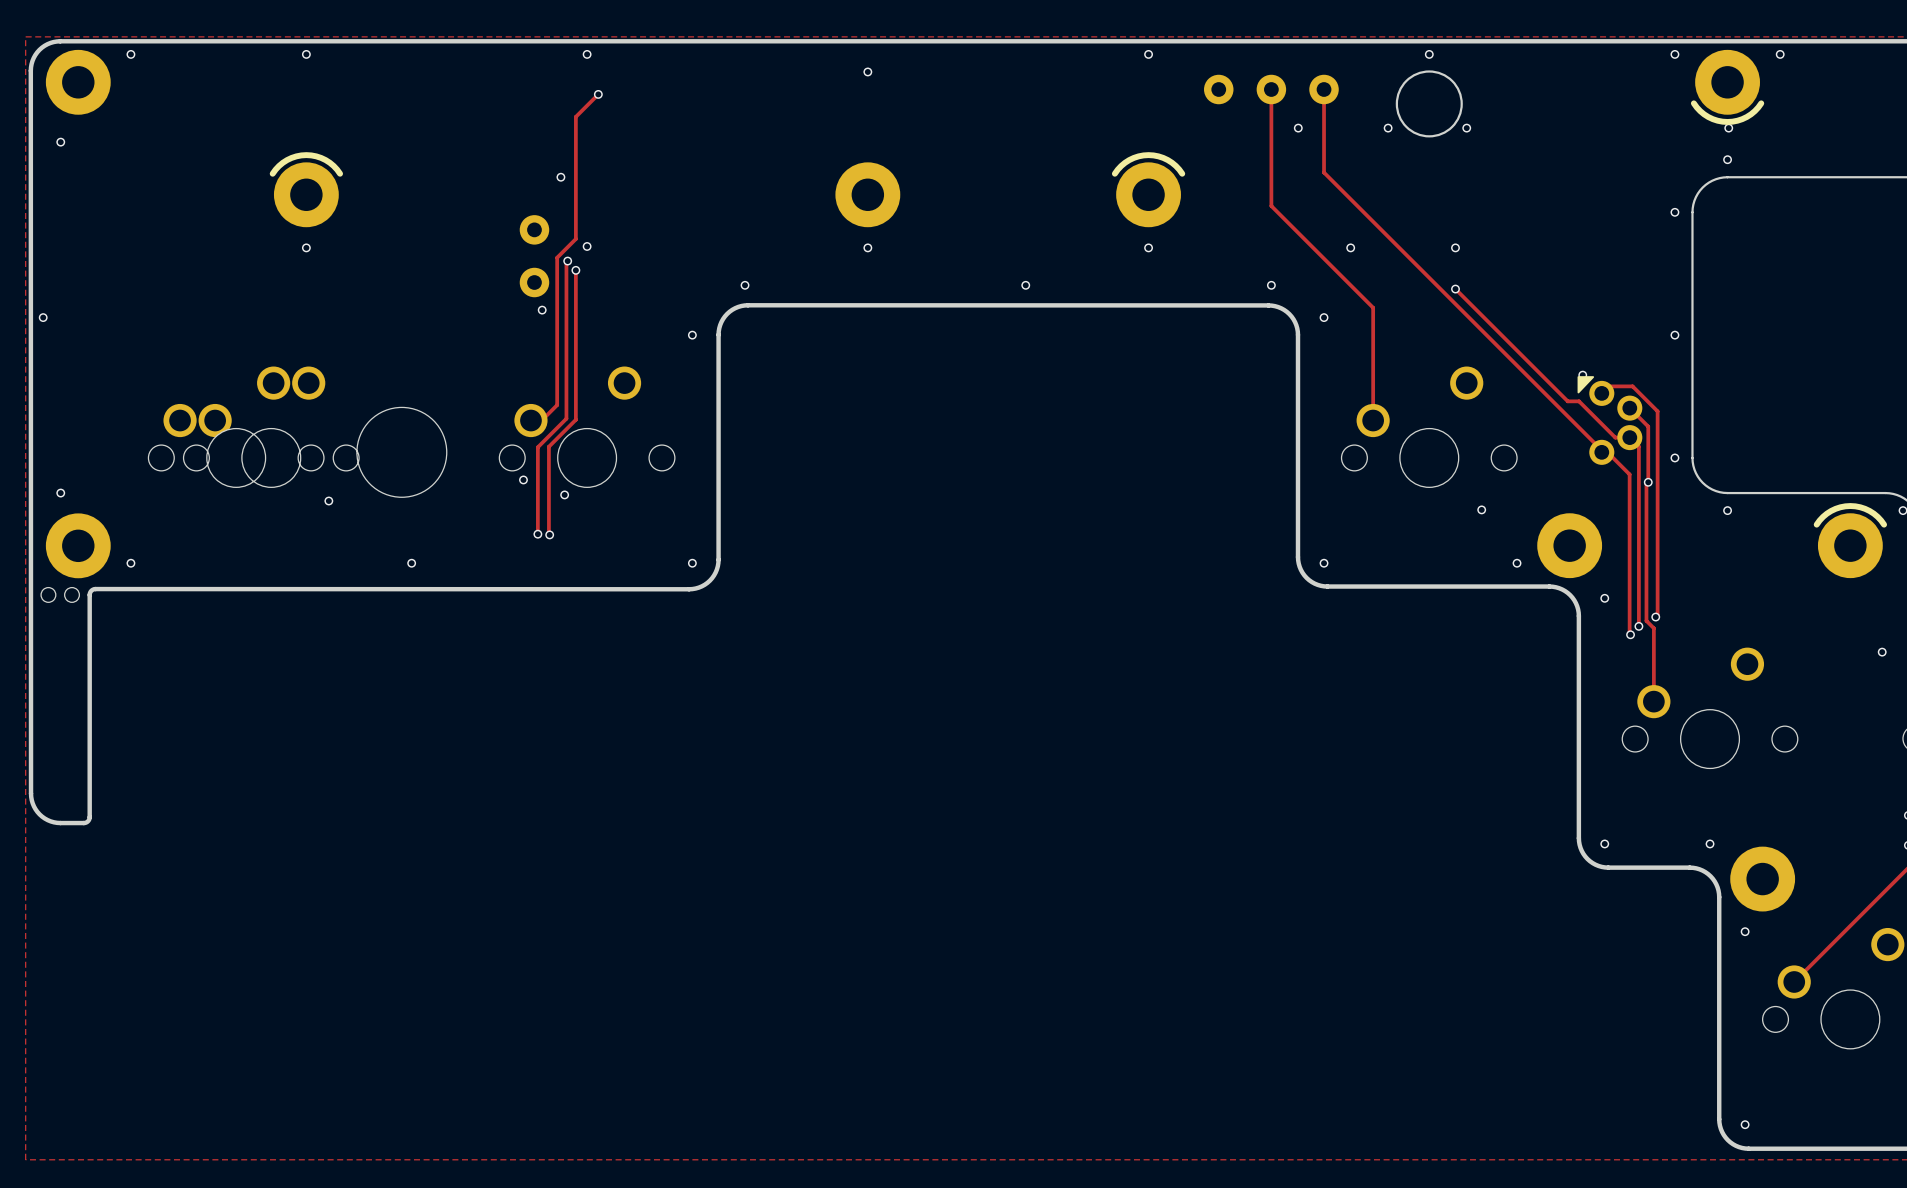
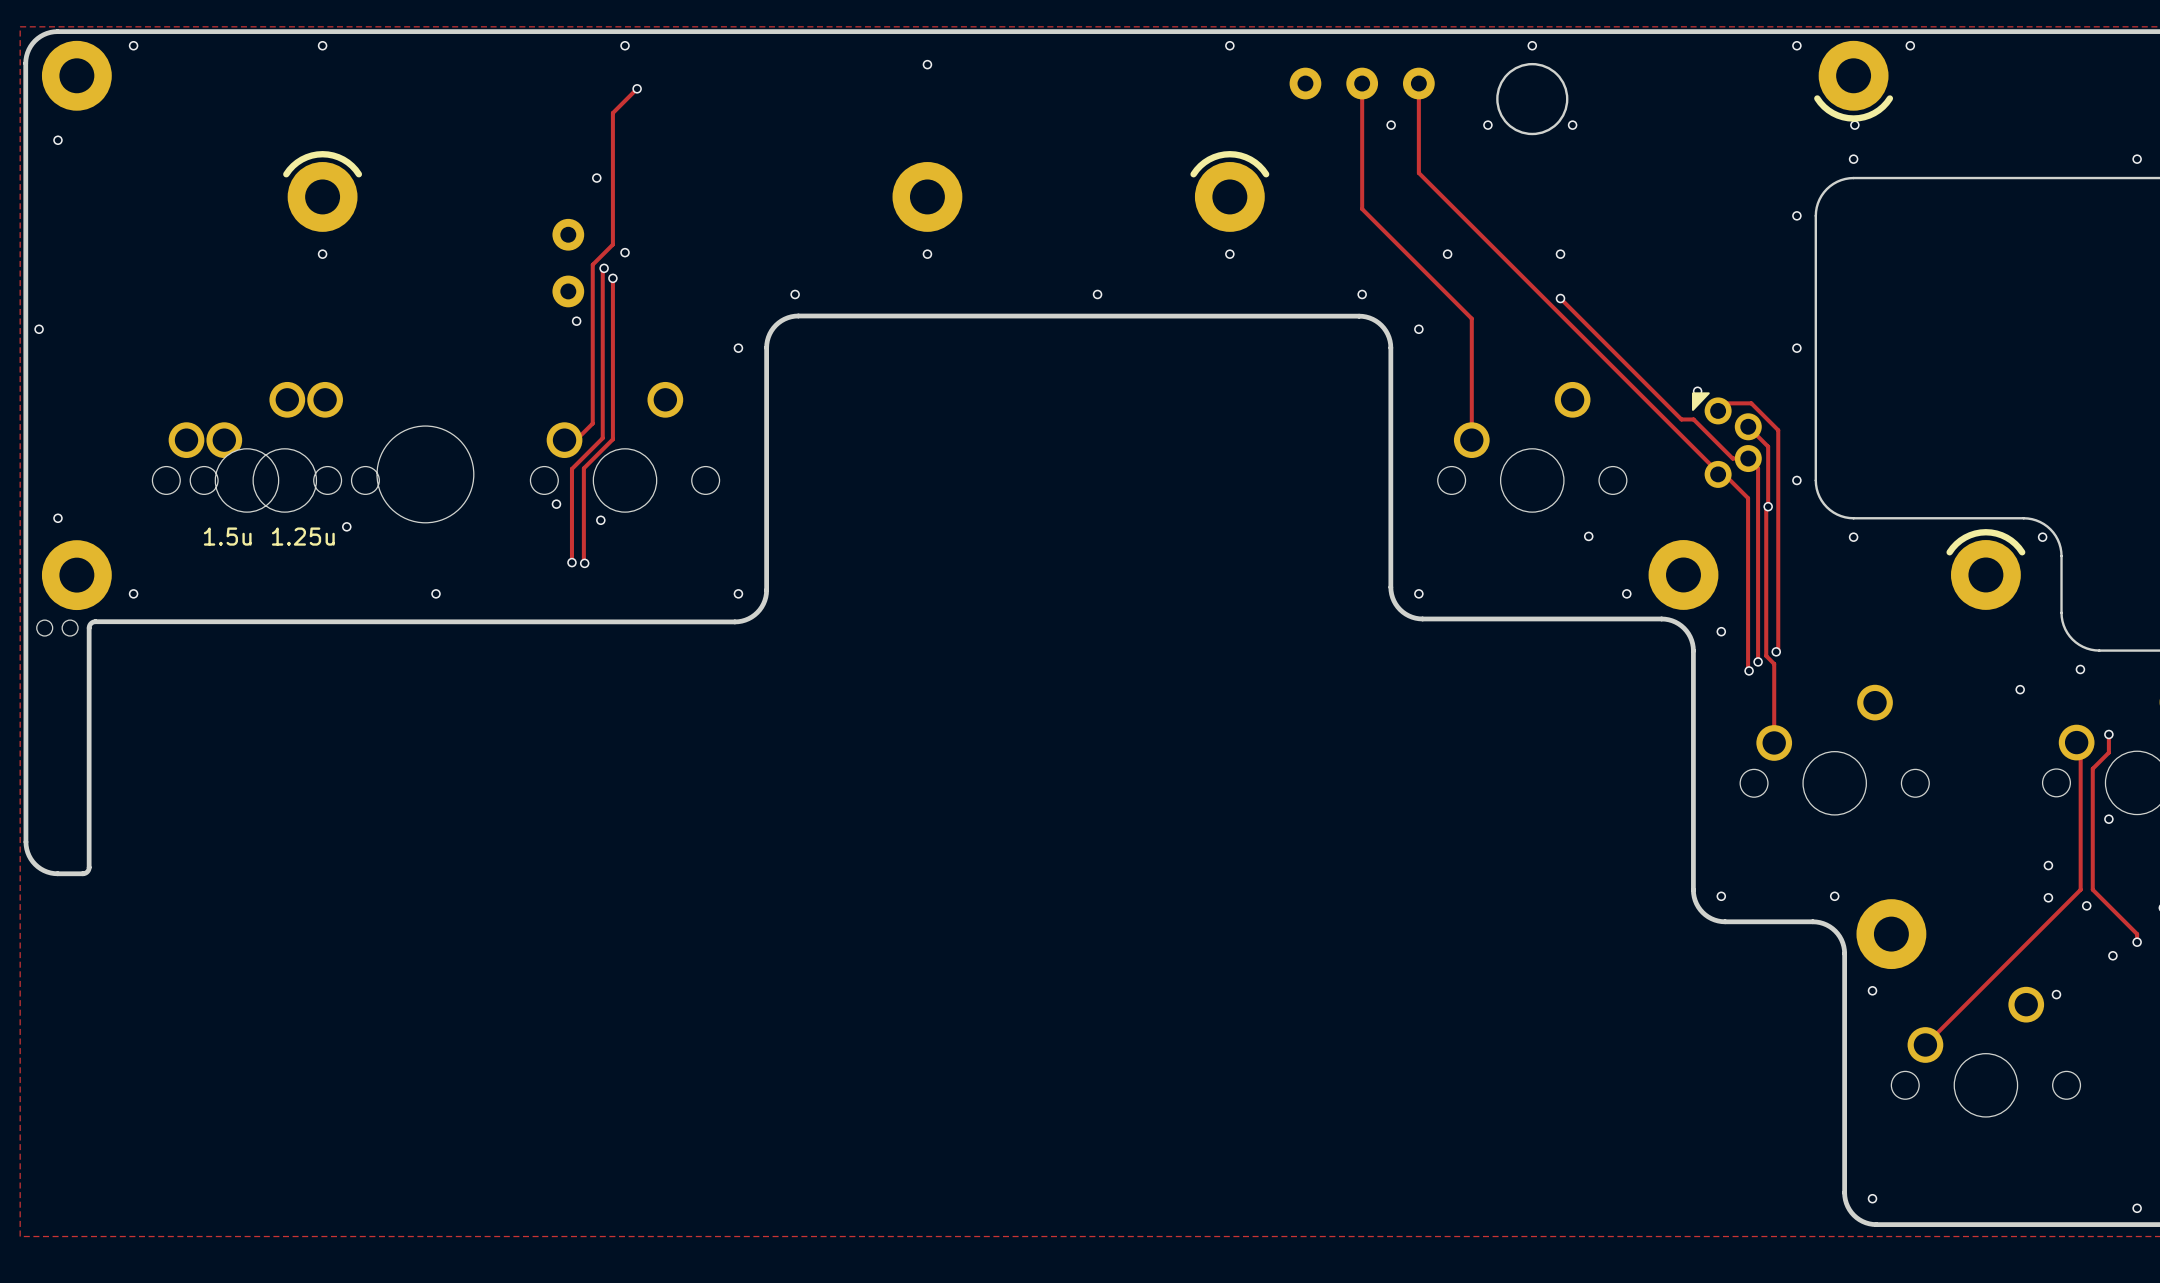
text: none -> 1.5u (227, 536)
text: none -> 1.25u (303, 536)

